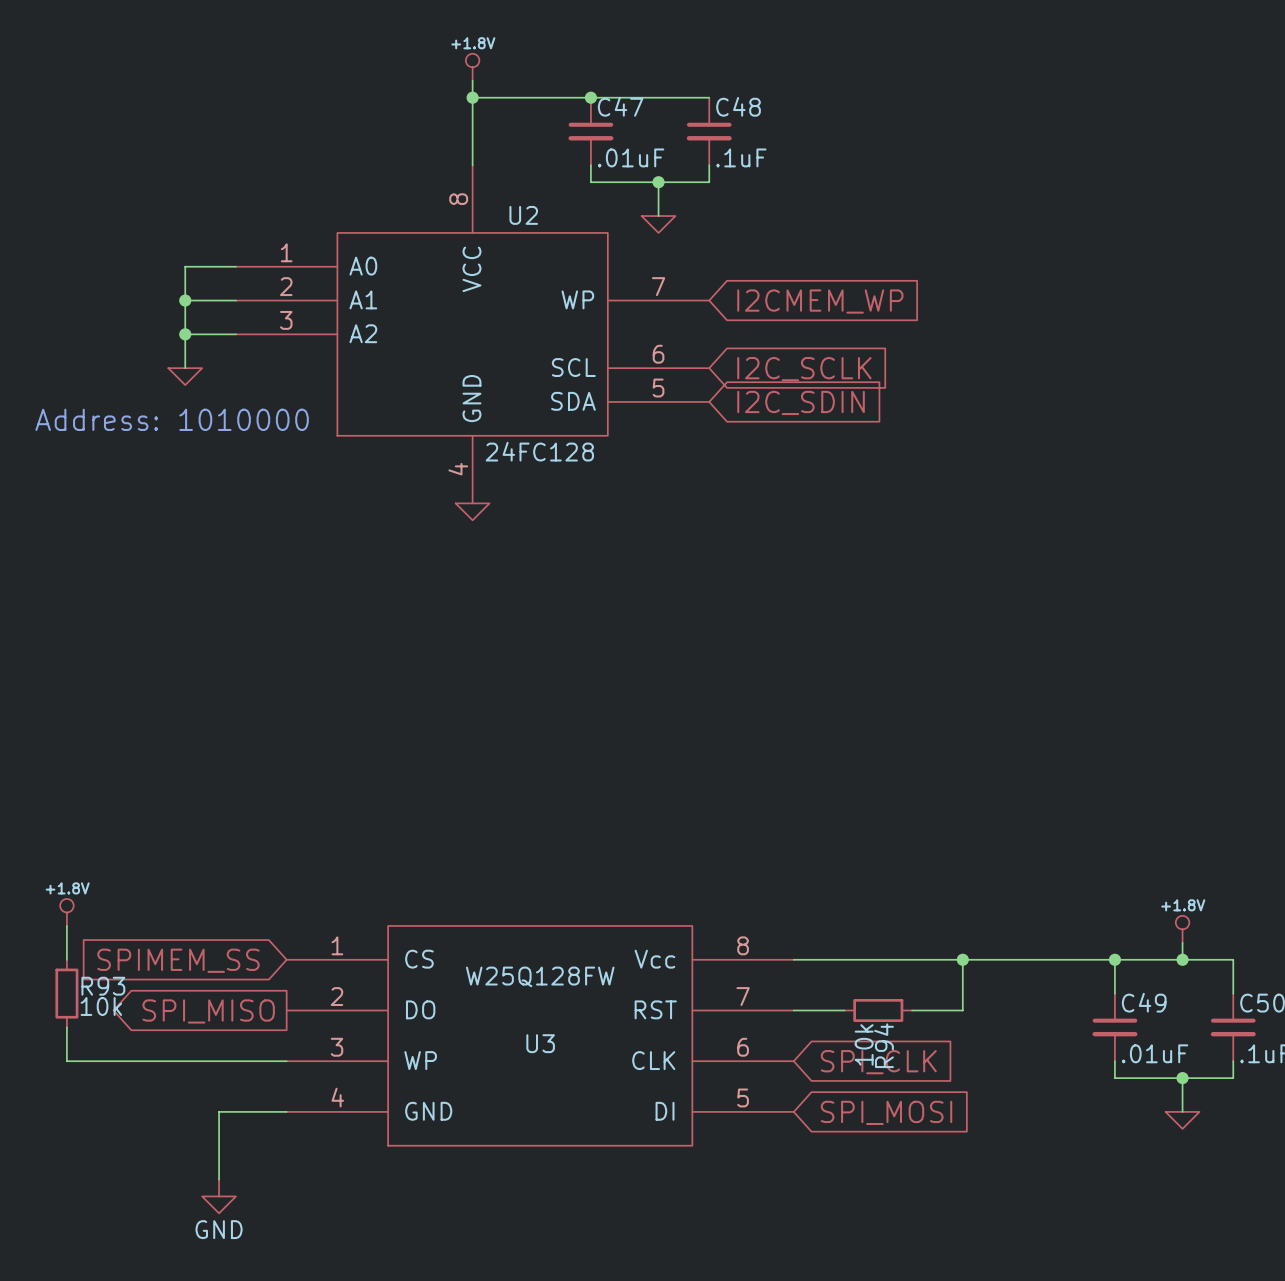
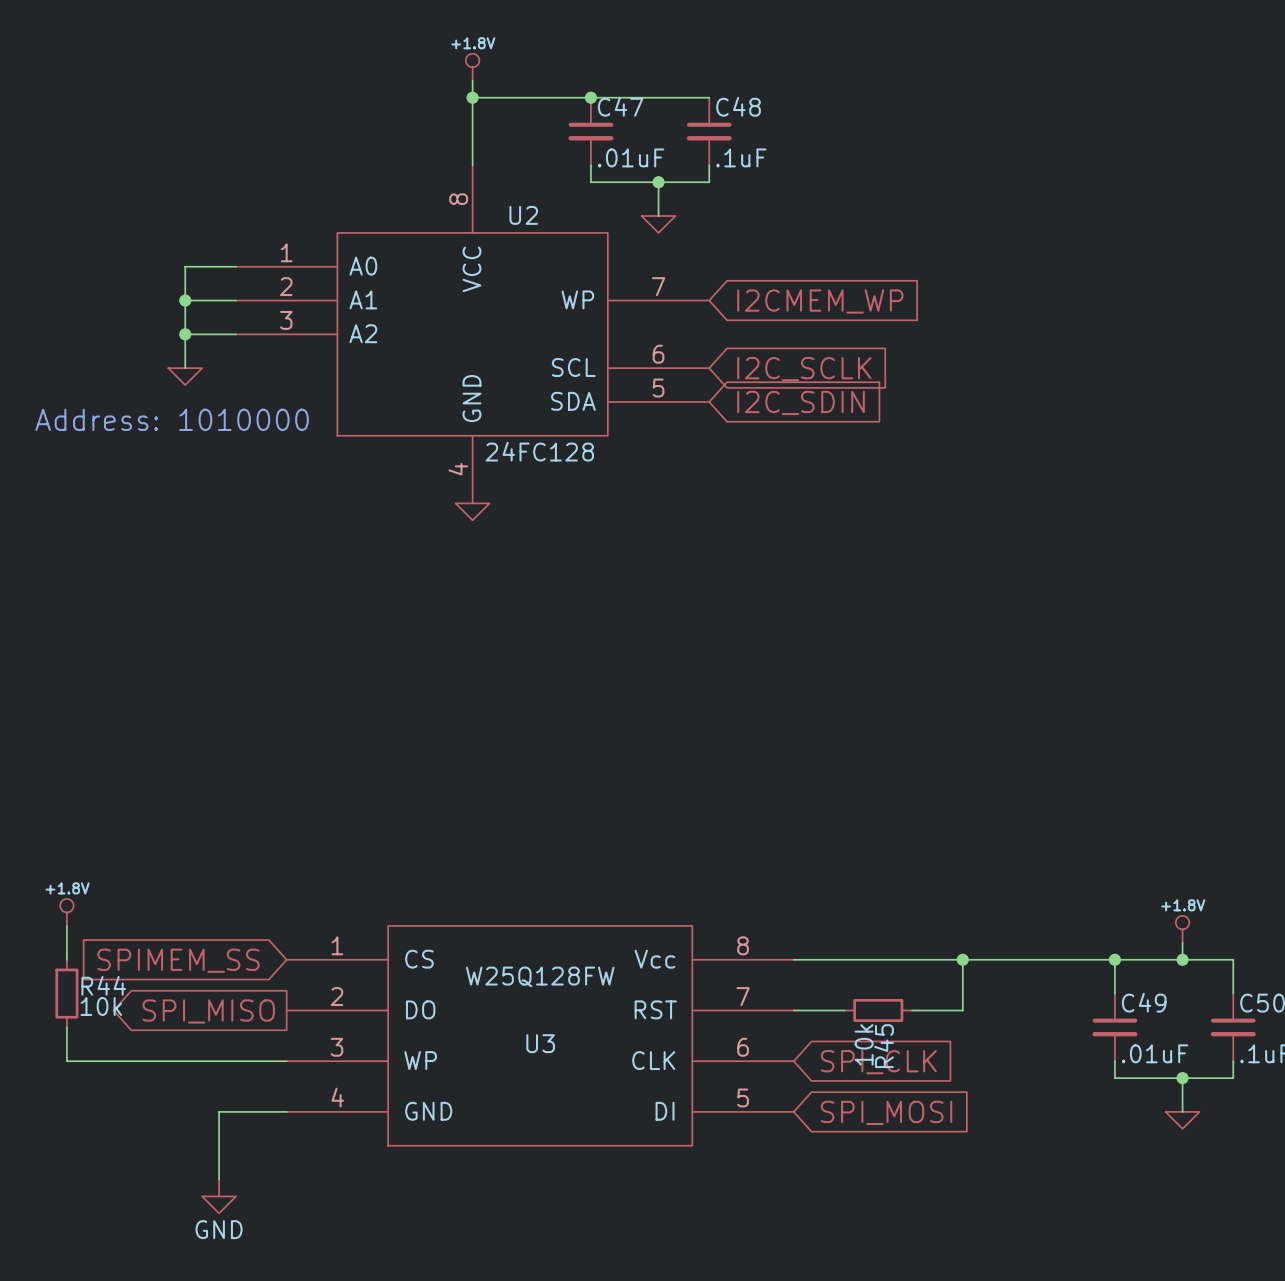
R93 name: R93 (103, 986) -> R44 (103, 985)
R94 name: R94 (884, 1045) -> R45 (884, 1046)

